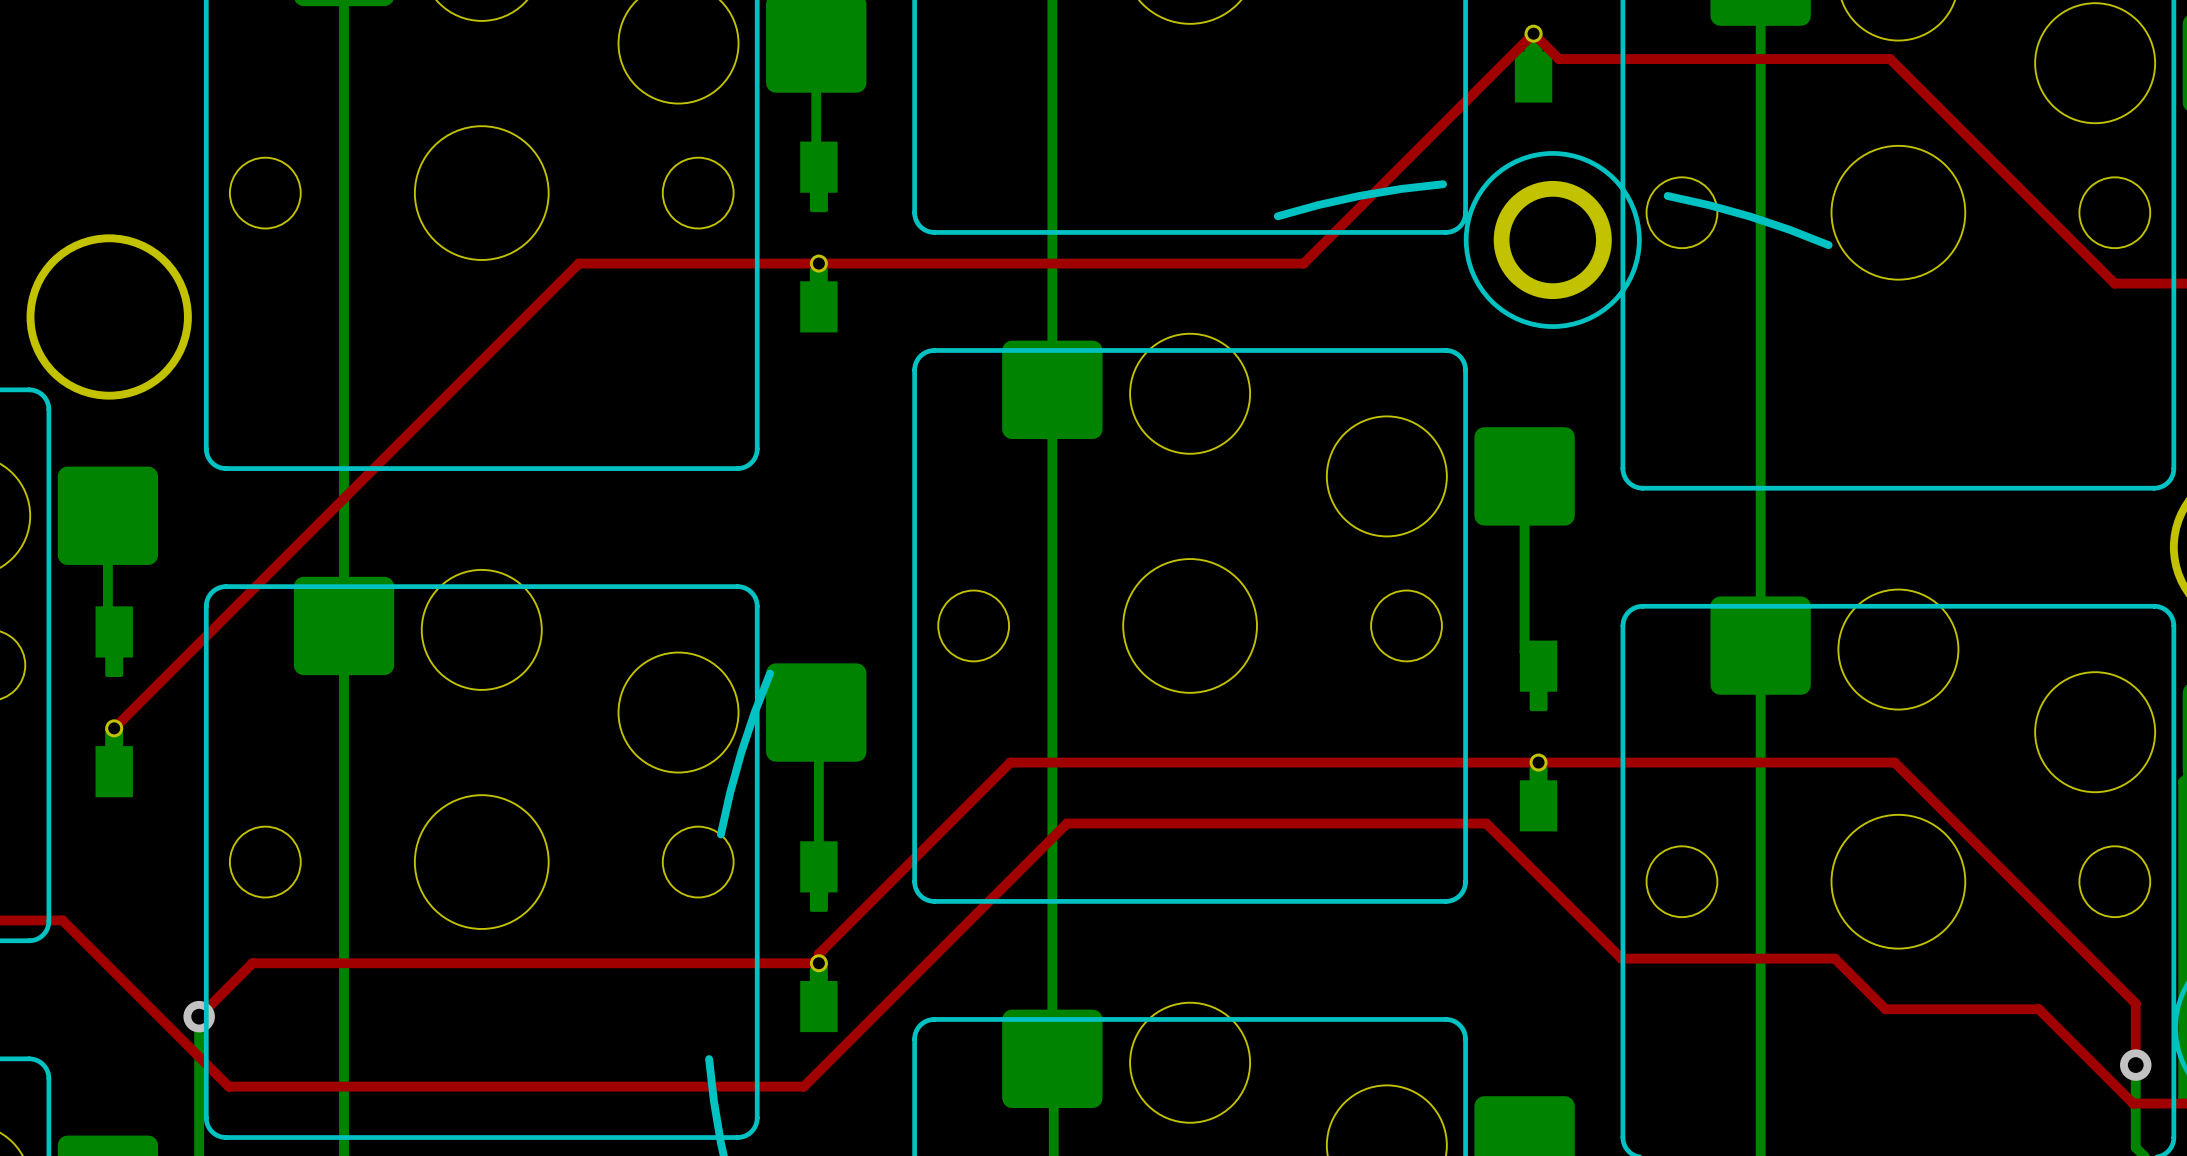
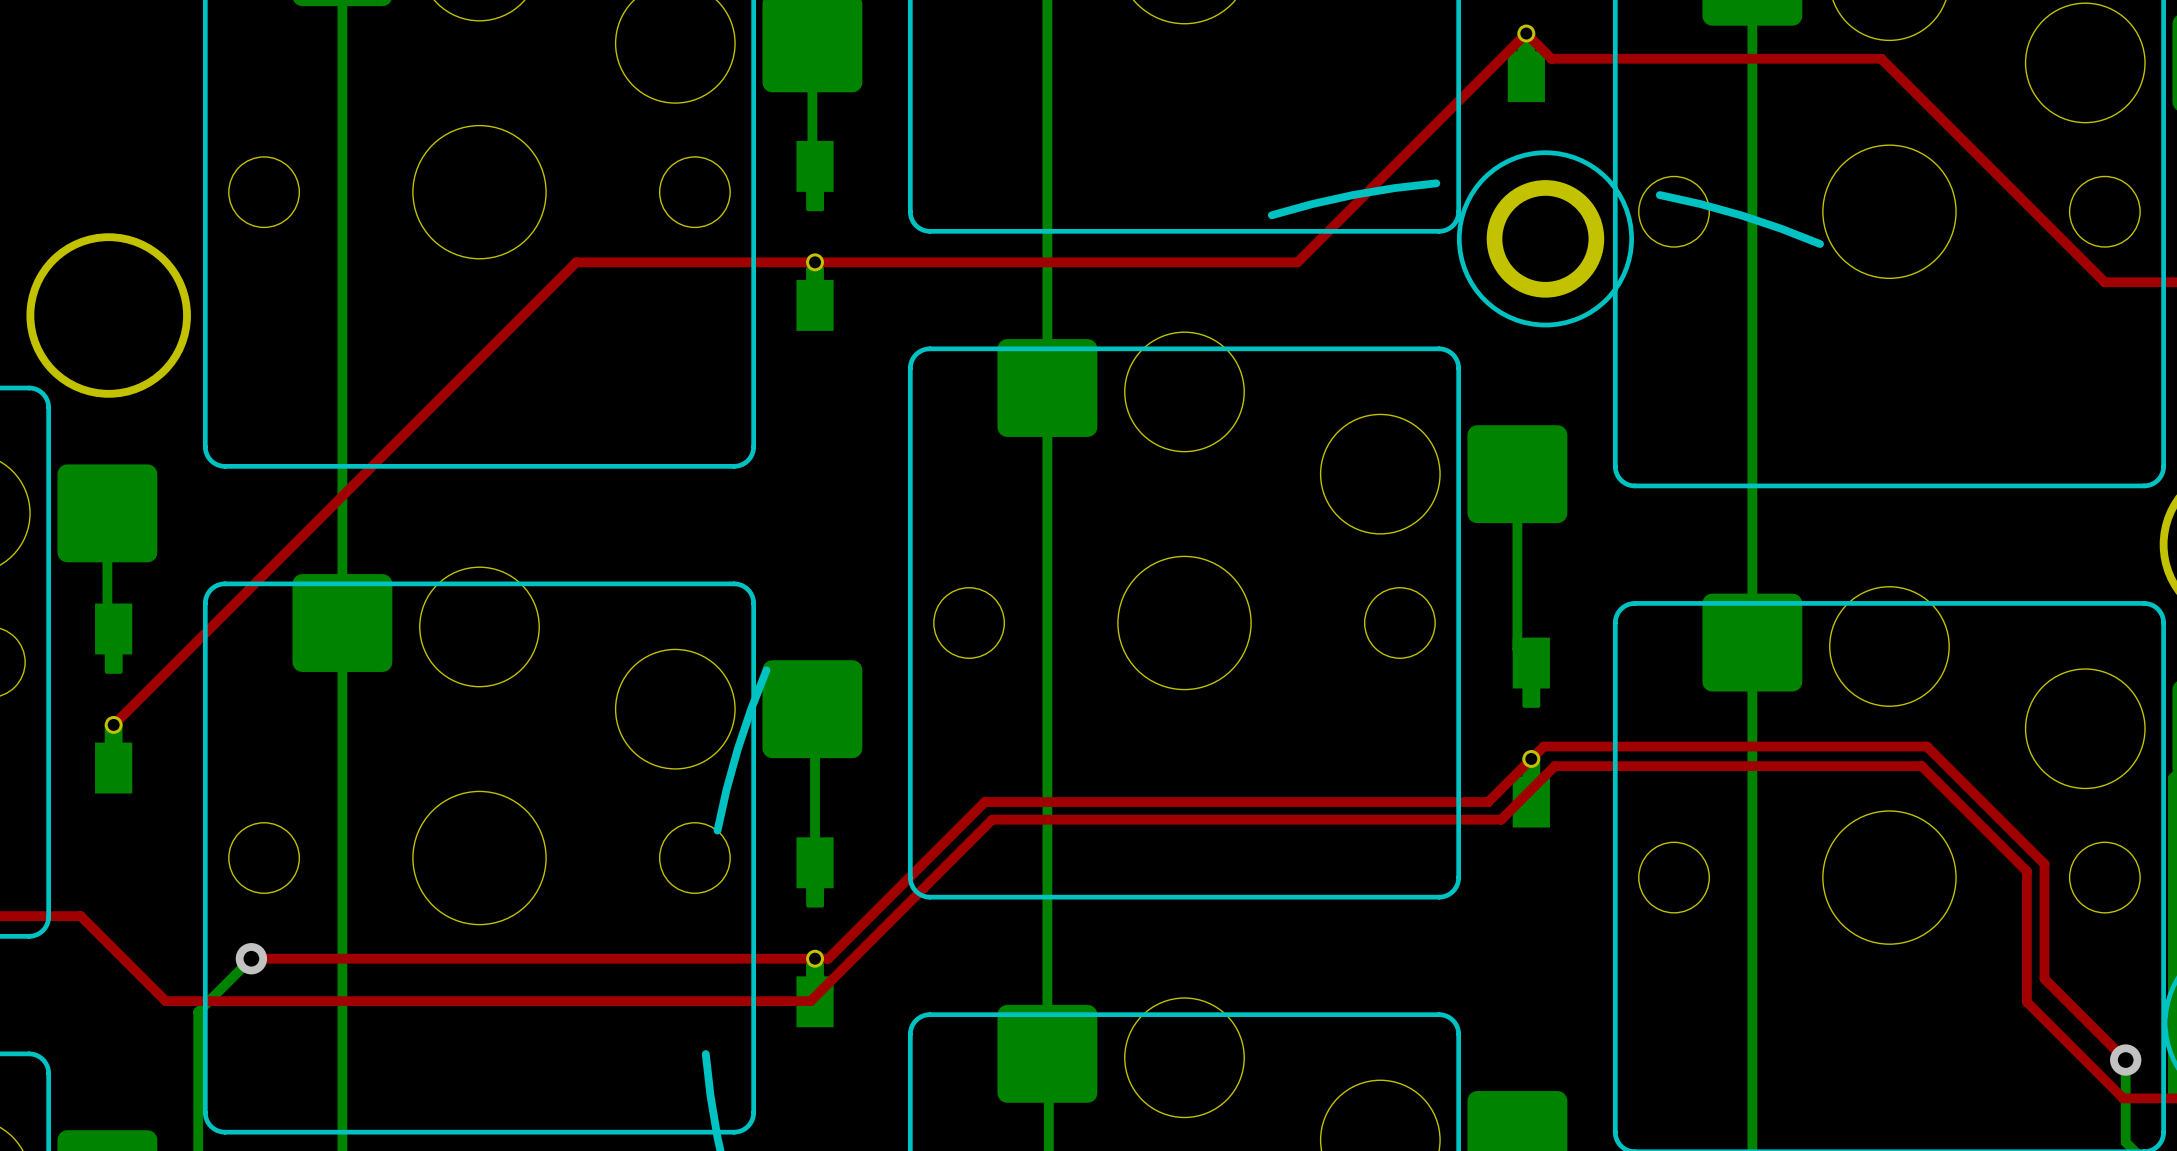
top track: (1066, 823) (803, 1086) (228, 1086) (62, 920) -> (1061, 819) (992, 819) (810, 1001) (165, 1001) (80, 916) (62, 916)
top track: (1486, 823) (1621, 958) (1834, 958) (1885, 1009) (2038, 1009) -> (1479, 819) (1501, 819) (1554, 766) (1921, 766) (2026, 871) (2026, 1002) (2029, 1004)
top track: (252, 963) (199, 1016) -> none
bottom track: none -> (251, 958) (198, 1011)
top track: (818, 963) (818, 954) (1010, 762) (1894, 762) (2135, 1003) (2135, 1065) -> (815, 958) (828, 958) (984, 802) (1488, 802) (1543, 746) (1927, 746) (2044, 864) (2044, 978) (2125, 1060)
via position: (199, 1016) -> (251, 958)

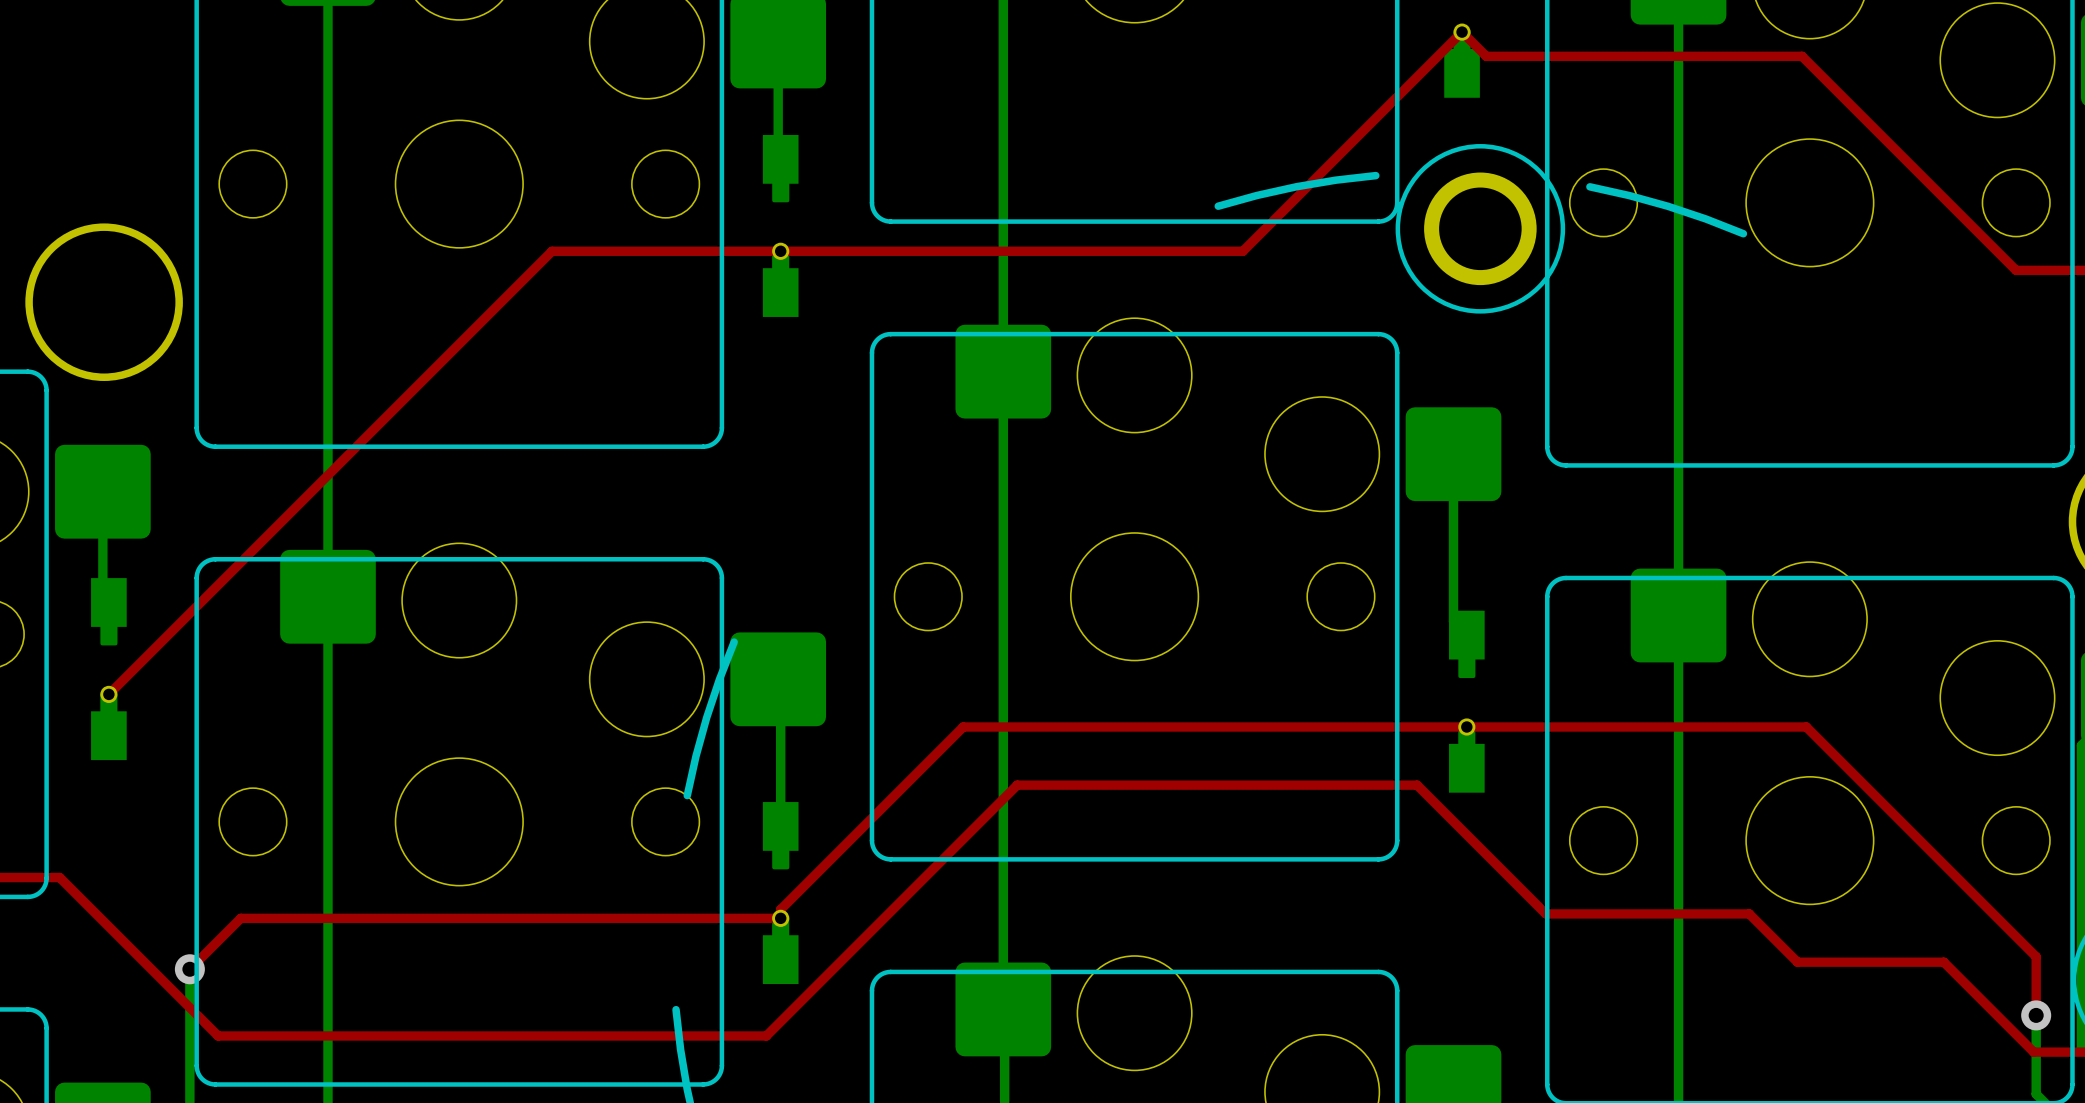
top track: (1061, 819) (992, 819) (810, 1001) (165, 1001) (80, 916) (62, 916) -> (1017, 785) (766, 1035) (218, 1035) (59, 877)
top track: (1479, 819) (1501, 819) (1554, 766) (1921, 766) (2026, 871) (2026, 1002) (2029, 1004) -> (1417, 785) (1545, 913) (1749, 913) (1797, 962) (1943, 962)
top track: none -> (240, 918) (189, 969)
bottom track: (251, 958) (198, 1011) -> none
via position: (251, 958) -> (189, 969)
top track: (815, 958) (828, 958) (984, 802) (1488, 802) (1543, 746) (1927, 746) (2044, 864) (2044, 978) (2125, 1060) -> (780, 918) (780, 909) (963, 727) (1806, 727) (2036, 956) (2036, 1015)

